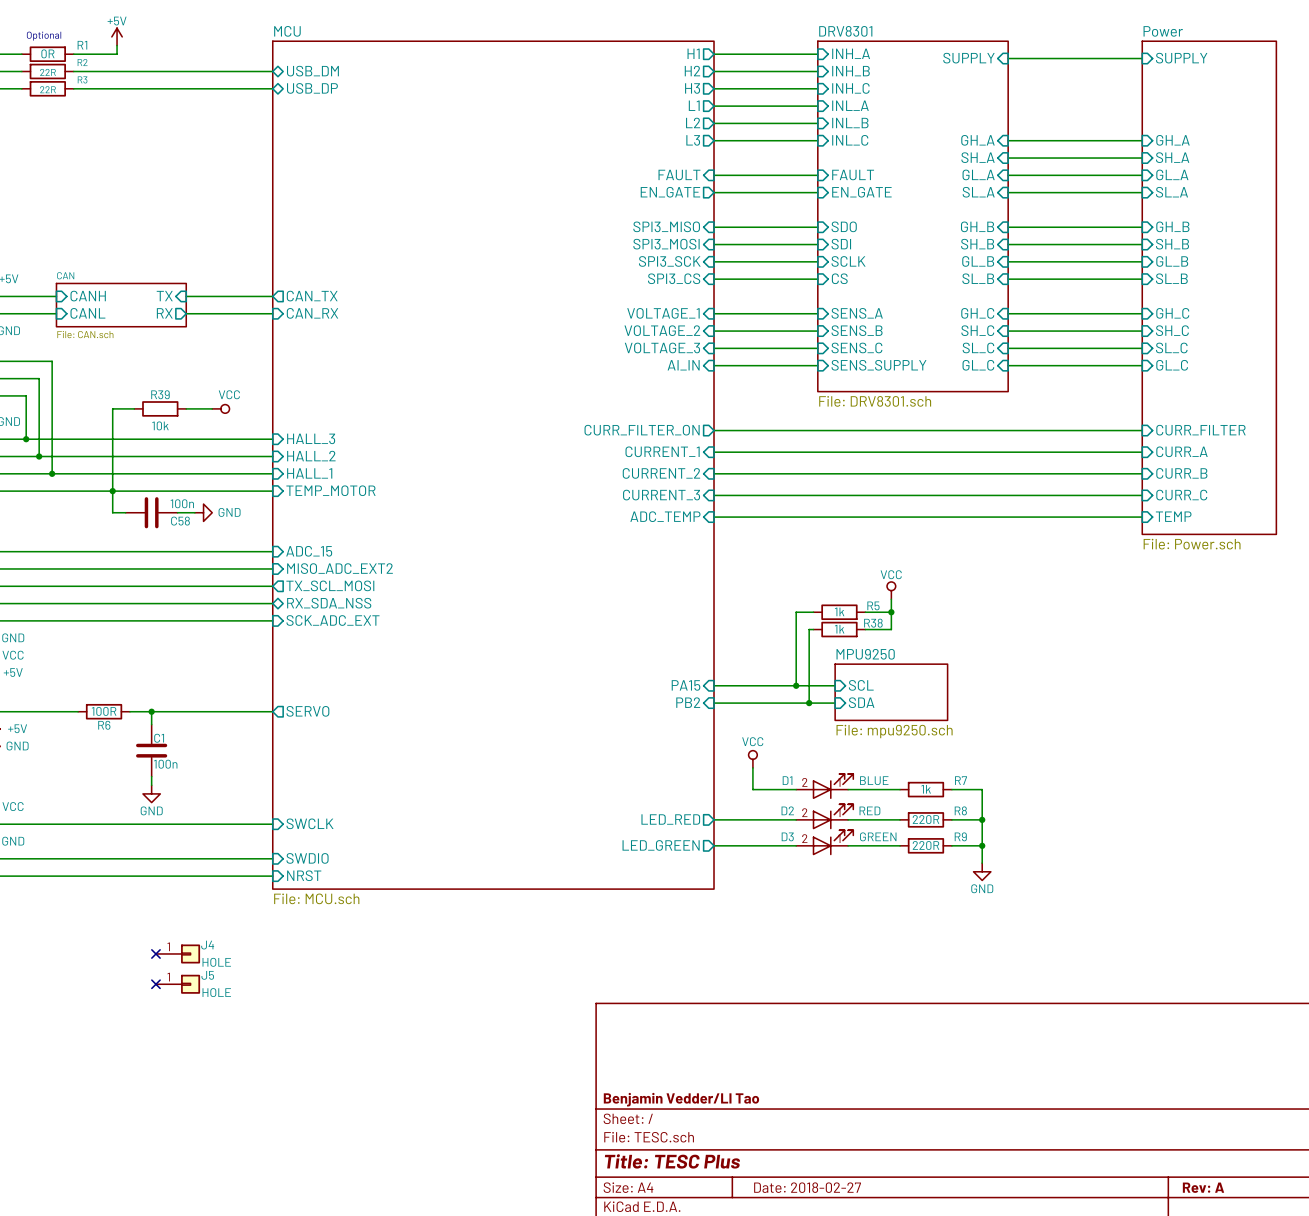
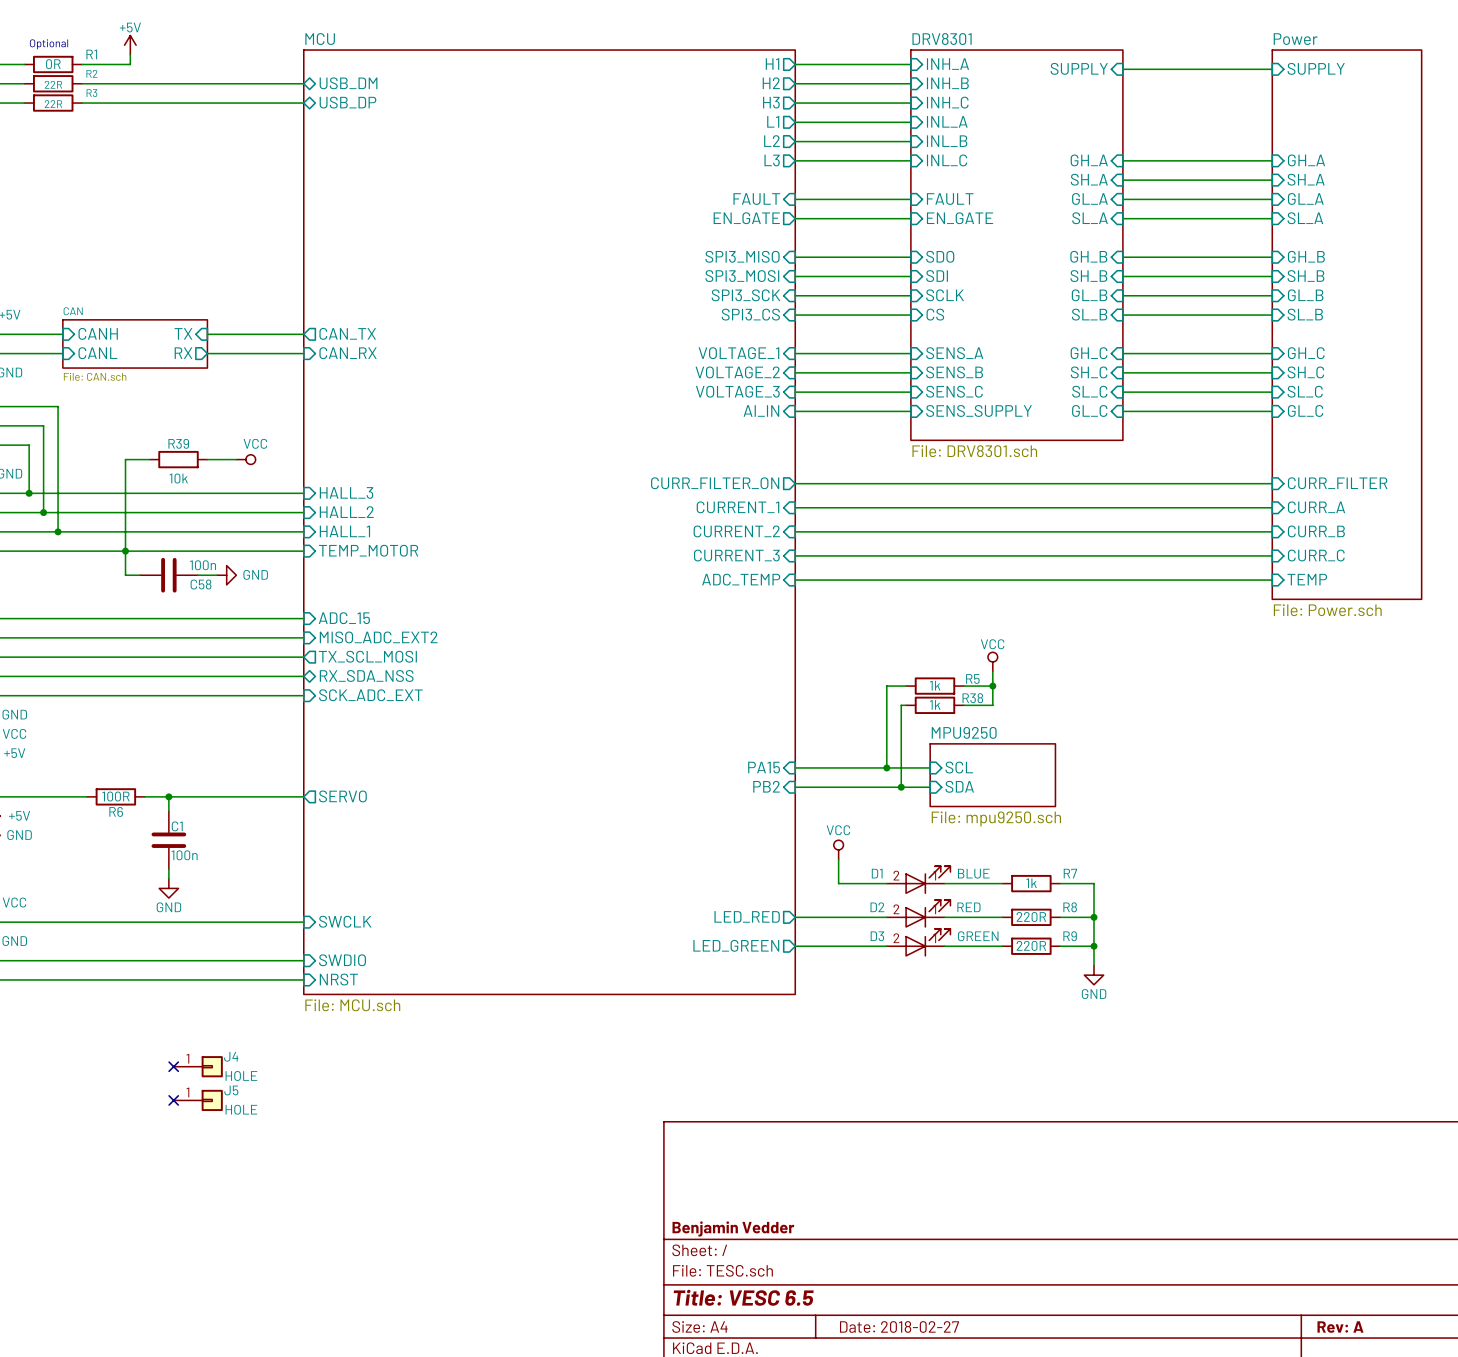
title block: Benjamin Vedder/LI Tao (681, 1099) -> Benjamin Vedder (733, 1229)
title block: Title: TESC Plus (672, 1161) -> Title: VESC 6.5 (743, 1297)

